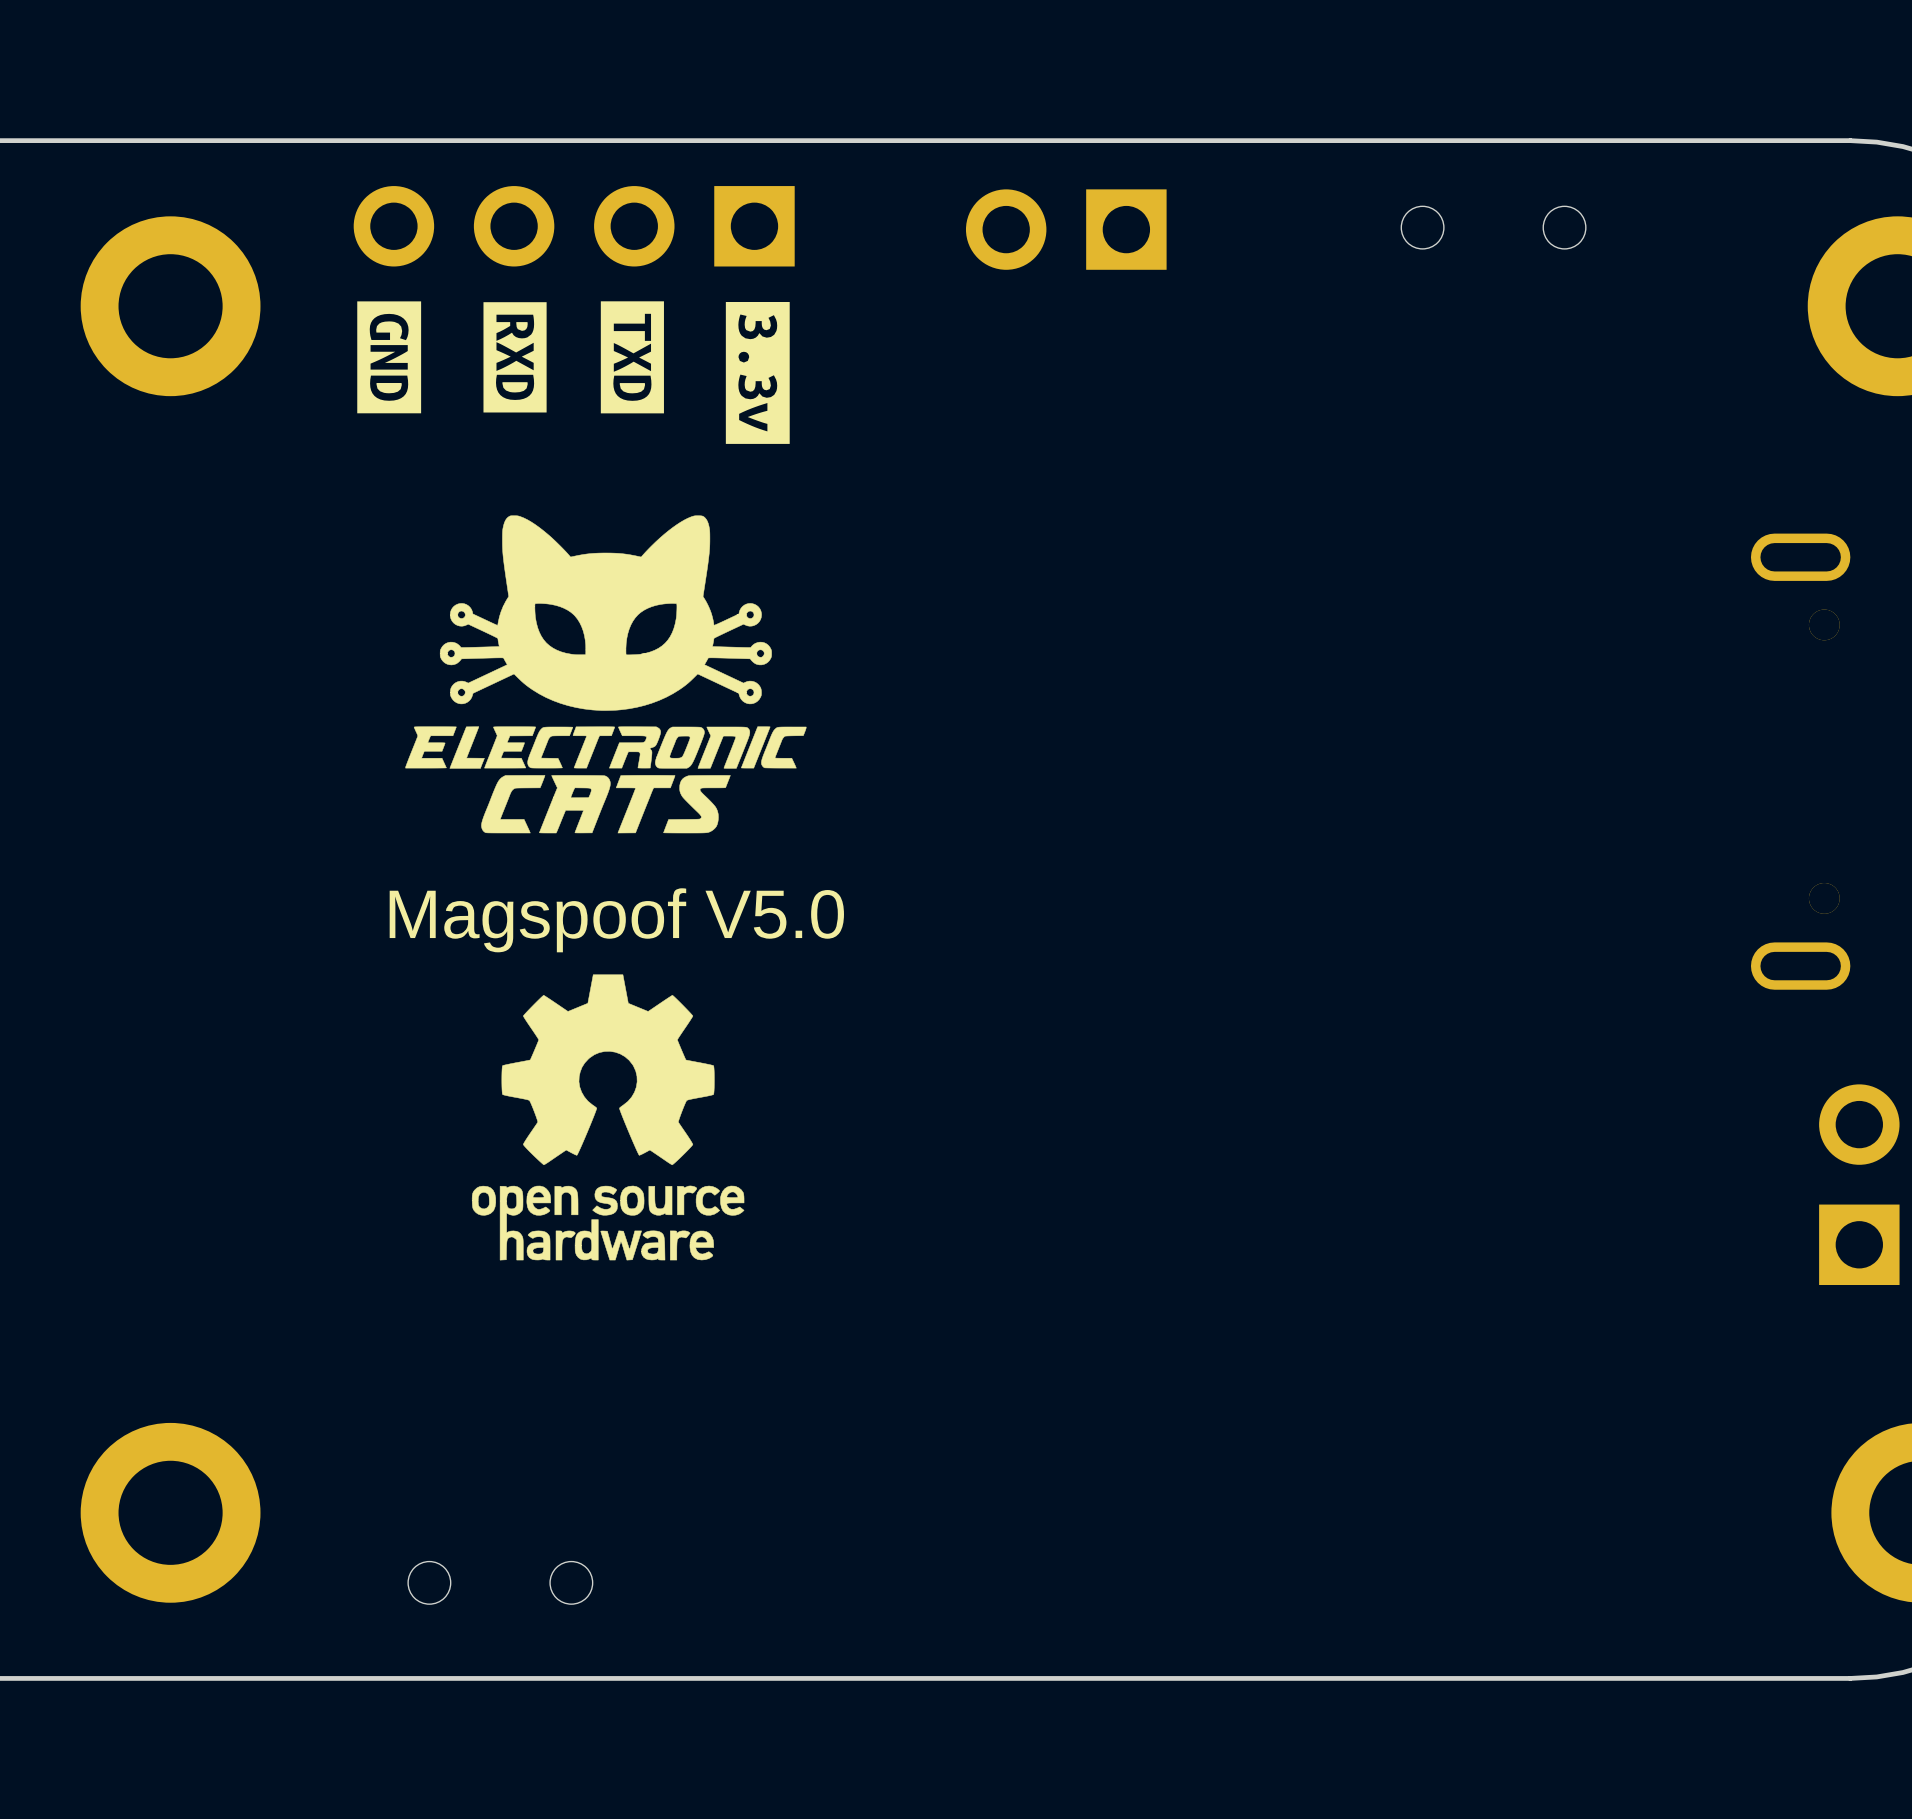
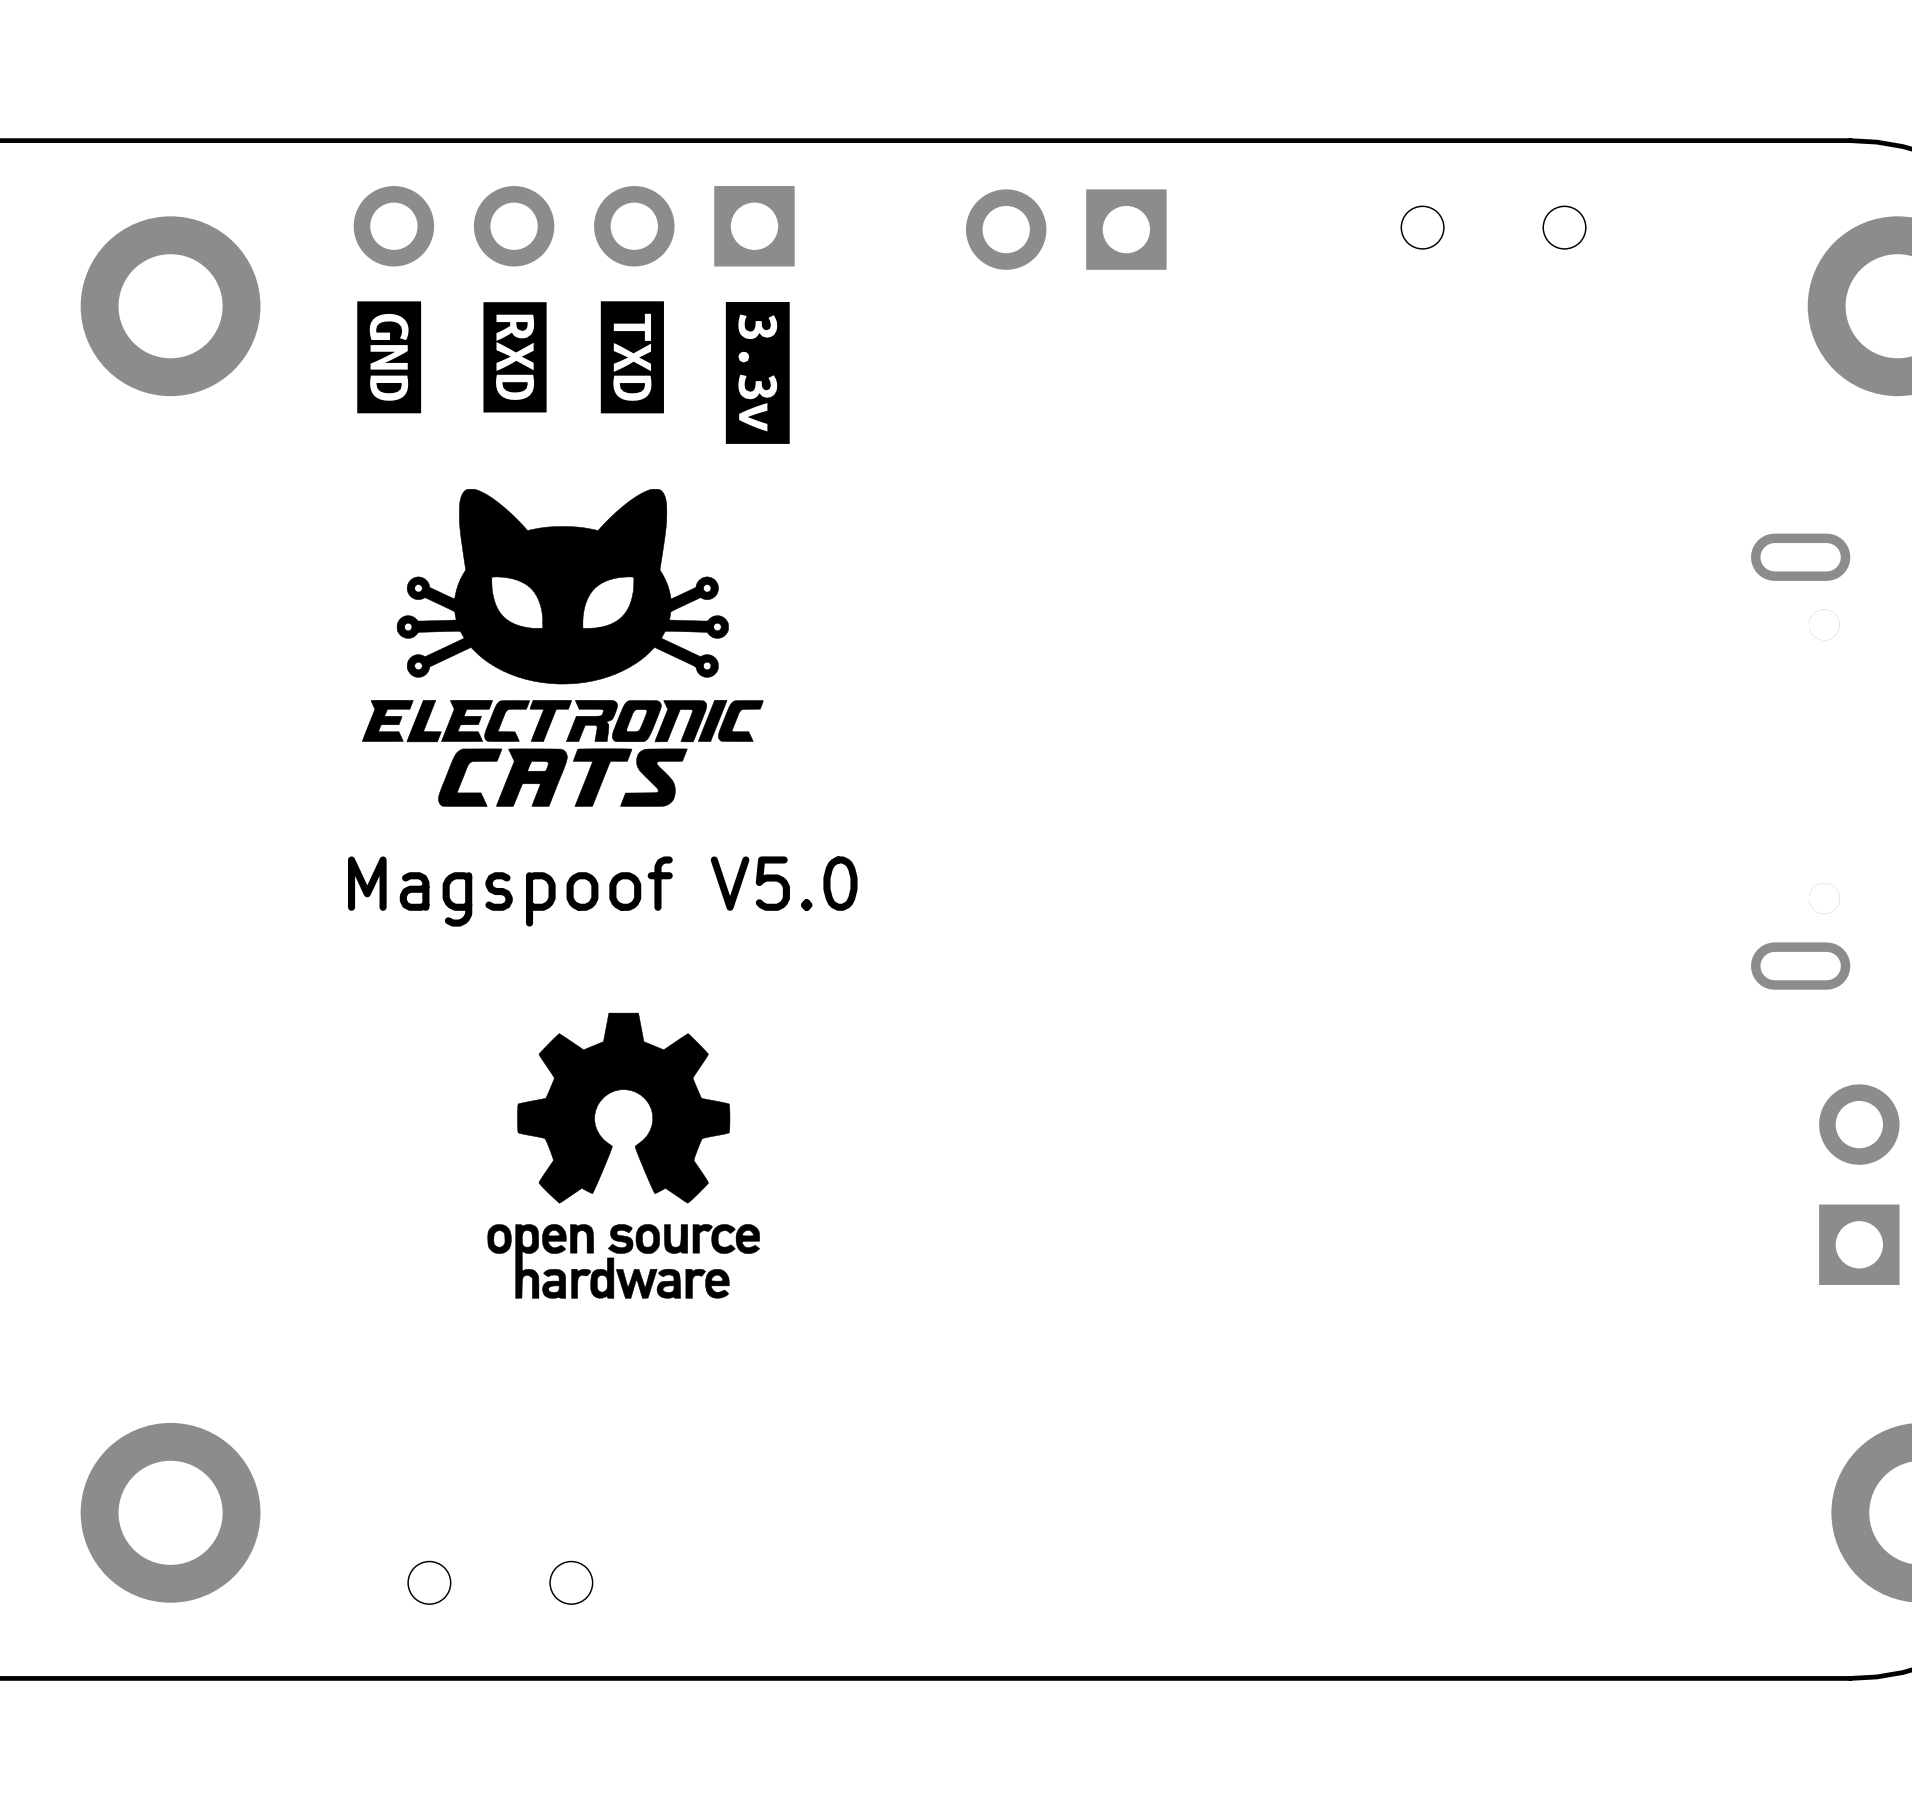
drawing position: (605, 674) -> (562, 647)
text position: Magspoof V5.0 (616, 920) -> Magspoof V5.0 (602, 891)
drawing position: (608, 1117) -> (623, 1155)

